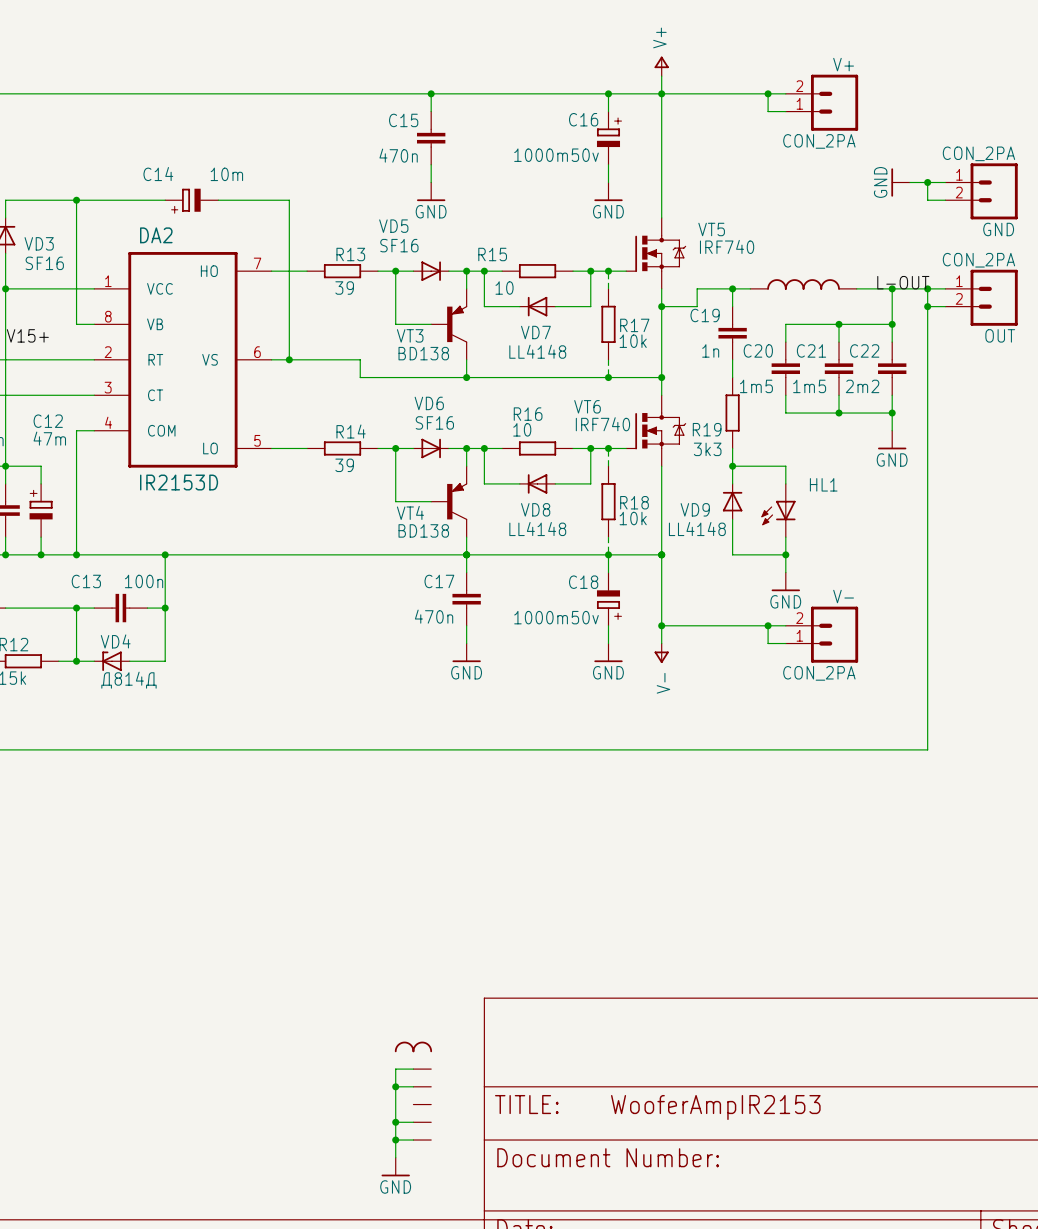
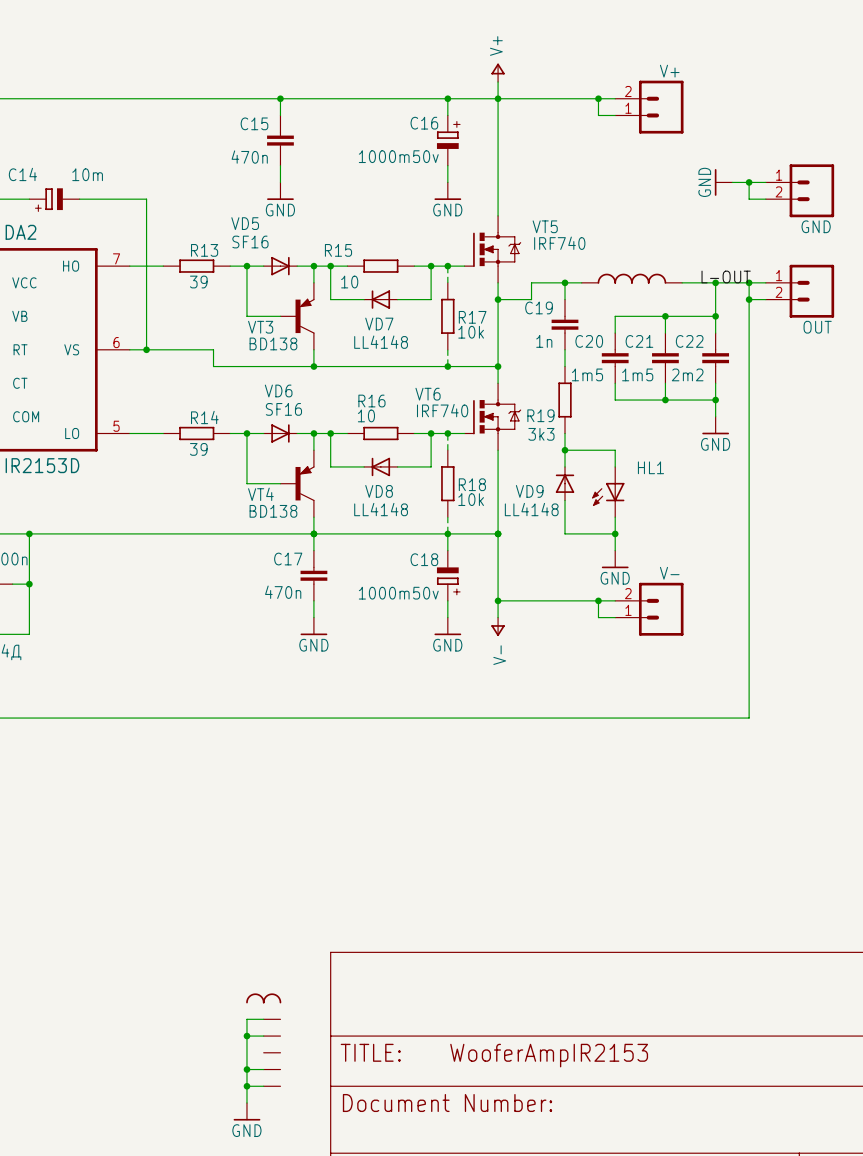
V+ value: CON_2PA (819, 141) -> none
GND value: CON_2PA (978, 153) -> none
OUT value: CON_2PA (978, 260) -> none
V- value: CON_2PA (819, 673) -> none

